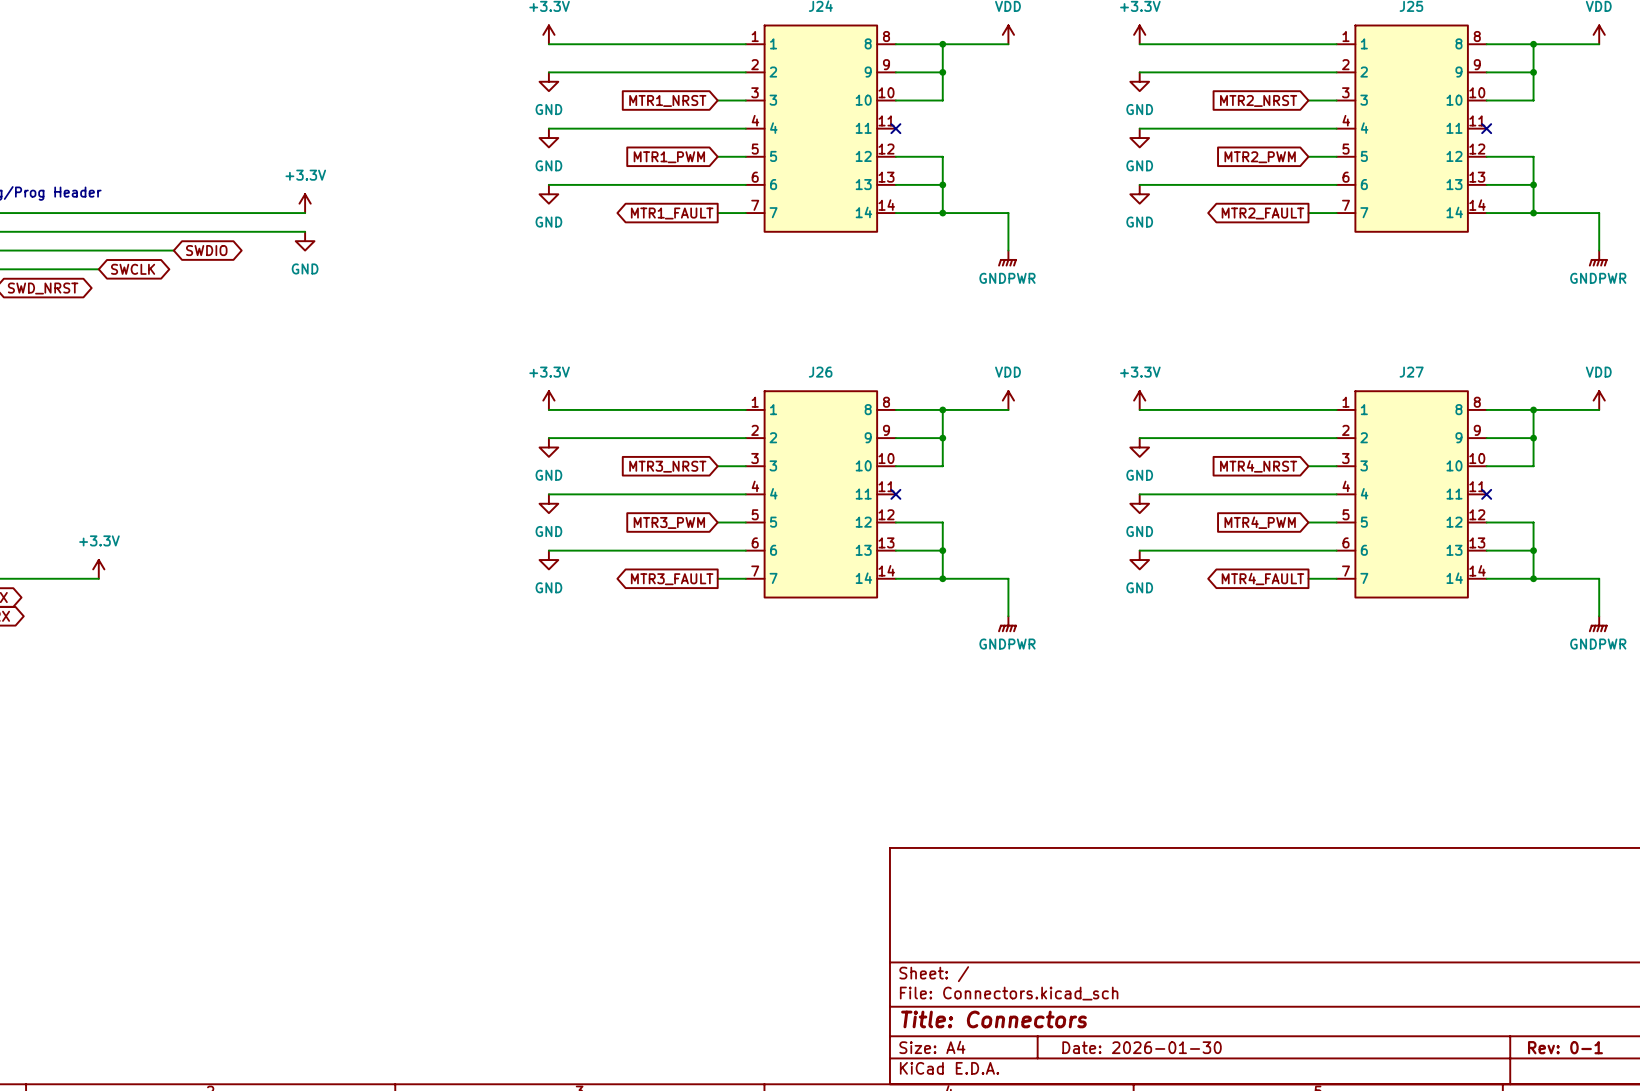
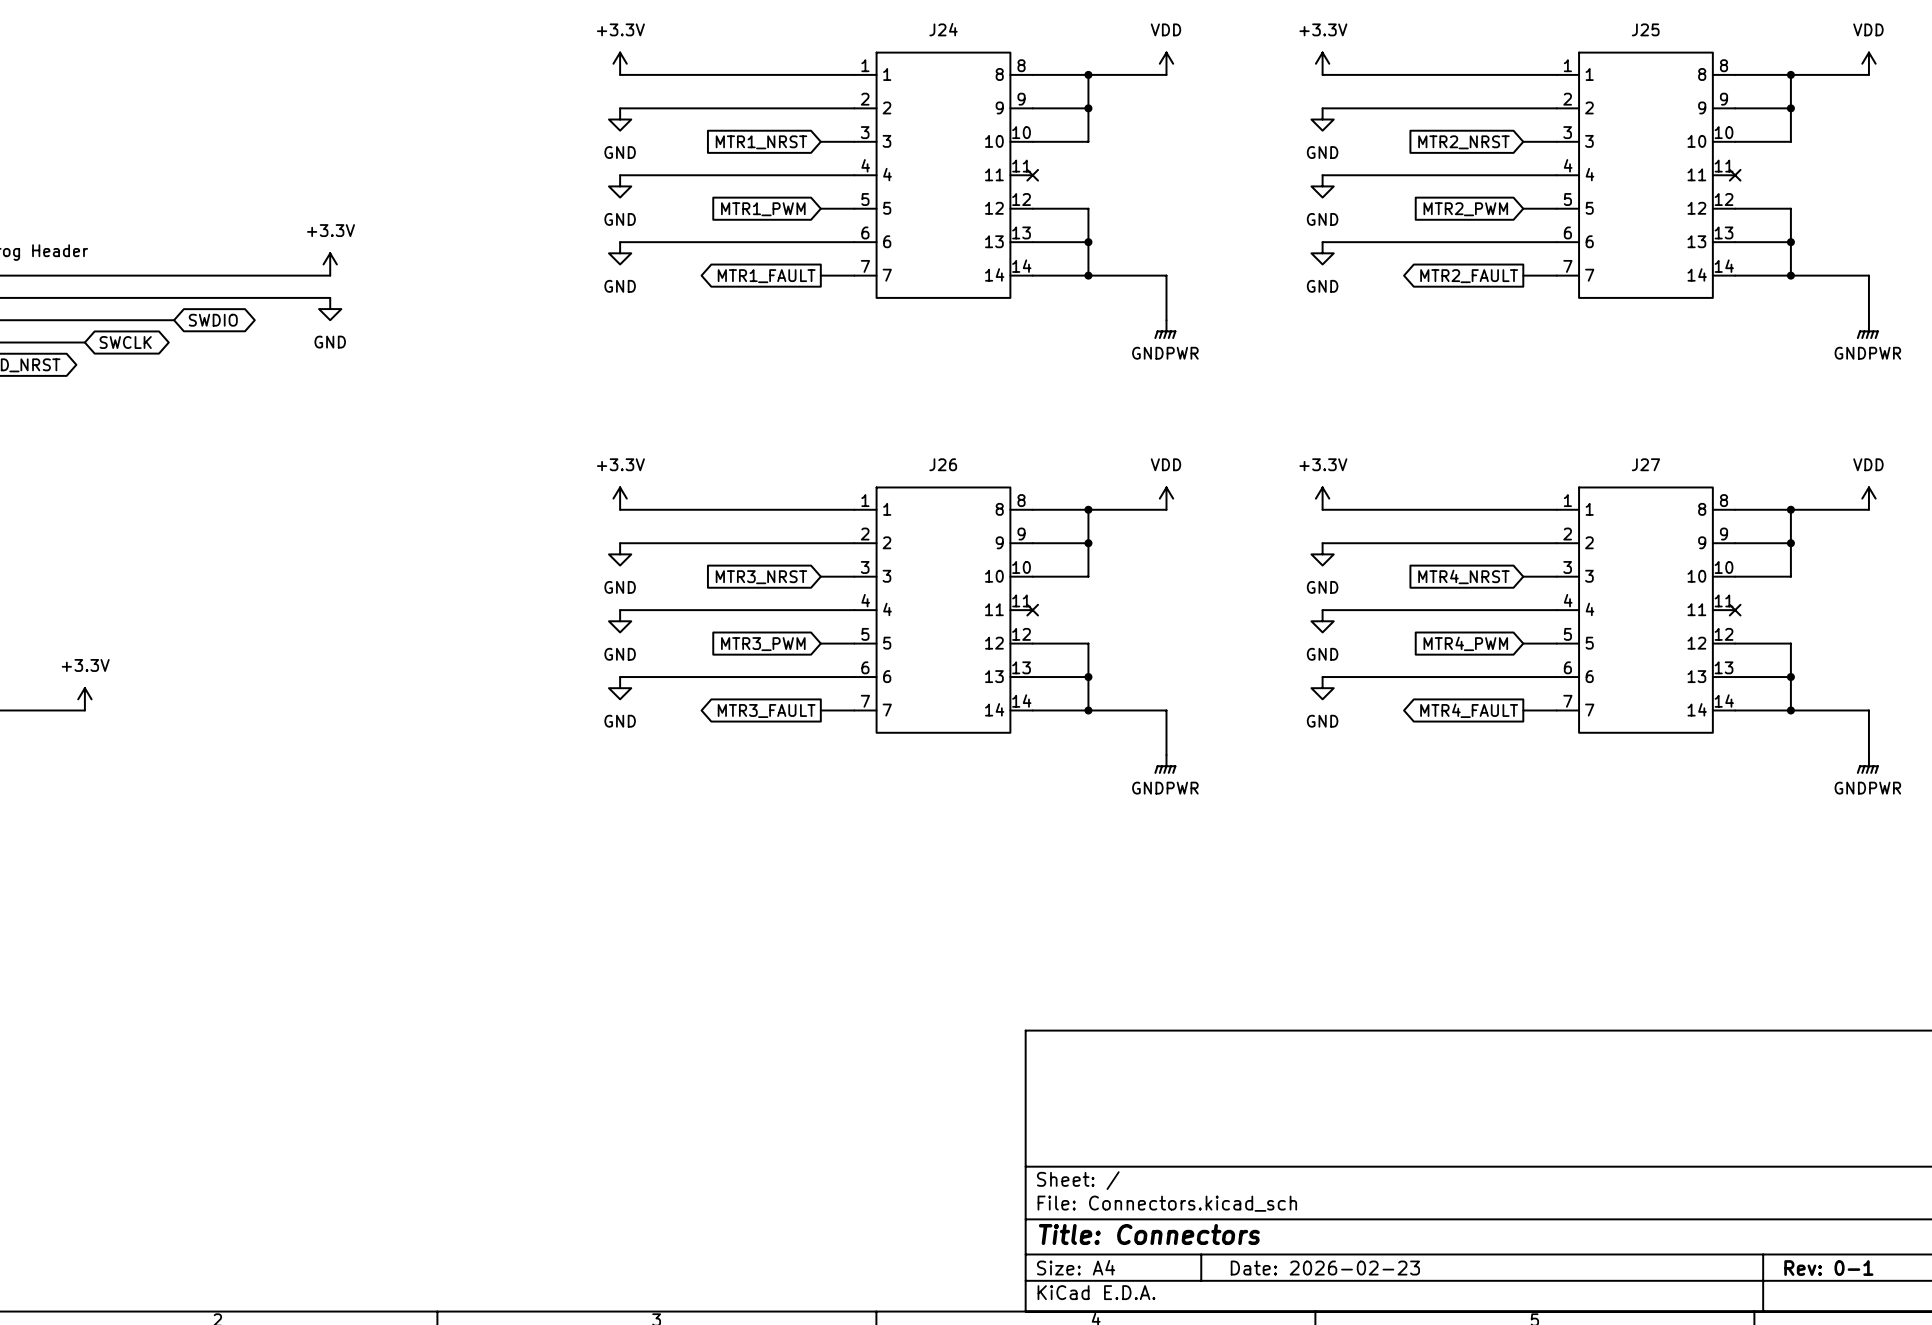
title block: Date: 2026-01-30 (1142, 1047) -> Date: 2026-02-23 (1325, 1268)

